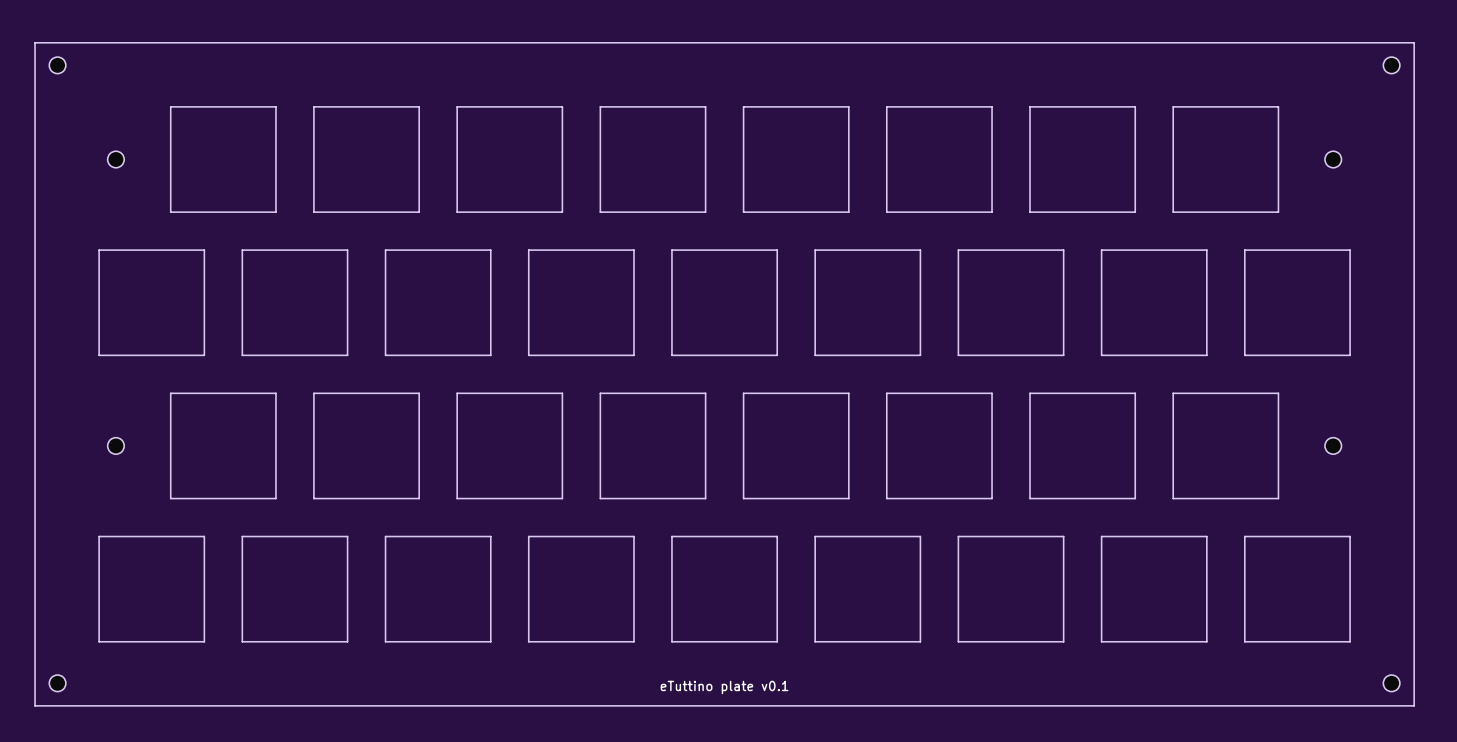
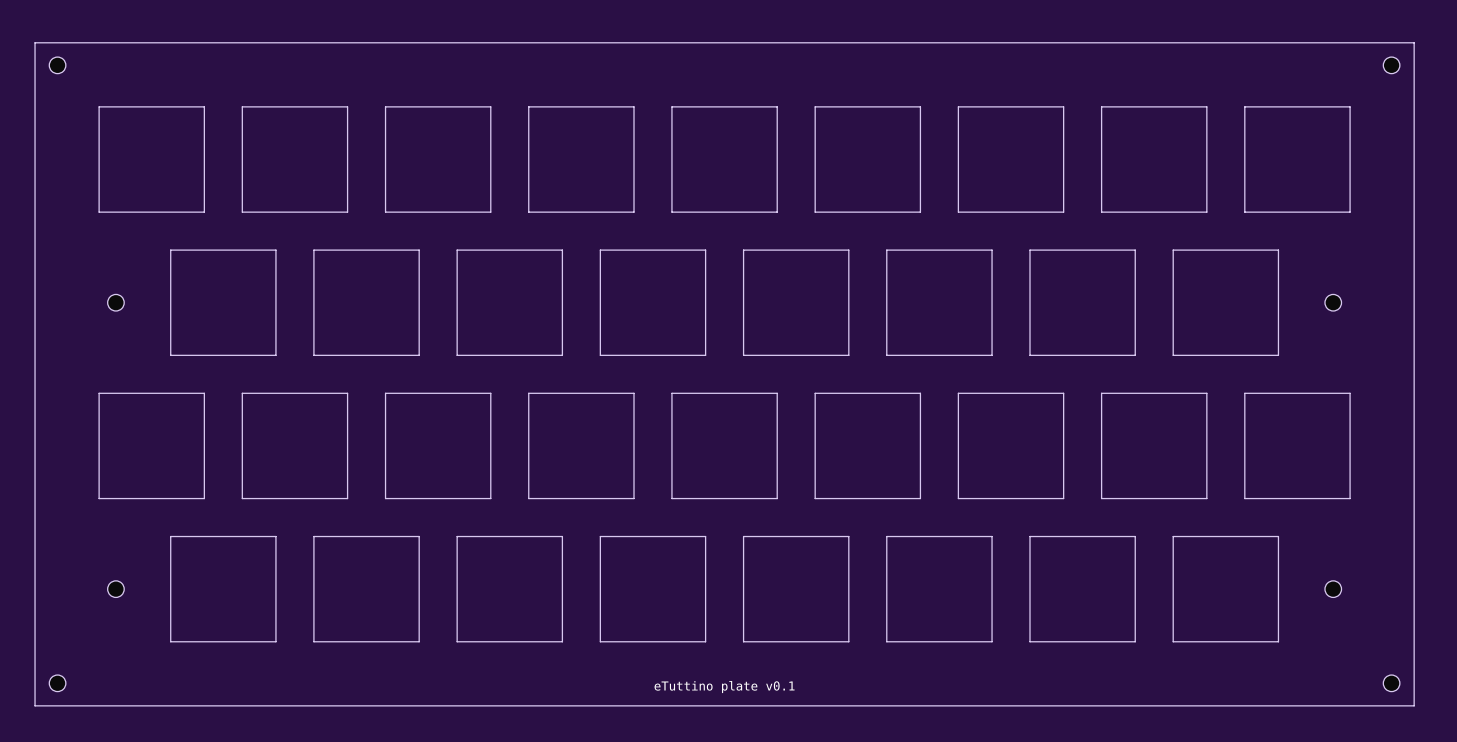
board edge: (170, 106) (170, 212) -> (170, 106) (99, 106) (99, 212) (170, 212)
board edge: (204, 106) (242, 106) -> (204, 106) (204, 212)
board edge: (275, 106) (275, 212) -> (275, 106) (313, 106)
board edge: (313, 106) (313, 212) -> (275, 212) (313, 212)
board edge: (347, 106) (385, 106) -> (347, 106) (347, 212)
board edge: (419, 106) (419, 212) -> (419, 106) (457, 106)
board edge: (457, 106) (457, 212) -> (419, 212) (457, 212)
board edge: (490, 106) (528, 106) -> (490, 106) (490, 212)
board edge: (562, 106) (562, 212) -> (562, 106) (600, 106)
board edge: (600, 106) (600, 212) -> (562, 212) (600, 212)
board edge: (634, 106) (671, 106) -> (634, 106) (634, 212)
board edge: (705, 106) (705, 212) -> (705, 106) (743, 106)
board edge: (743, 106) (743, 212) -> (705, 212) (743, 212)
board edge: (777, 106) (815, 106) -> (777, 106) (777, 212)
board edge: (848, 106) (848, 212) -> (848, 106) (886, 106)
board edge: (886, 106) (886, 212) -> (848, 212) (886, 212)
board edge: (920, 106) (958, 106) -> (920, 106) (920, 212)
board edge: (992, 106) (992, 212) -> (992, 106) (1029, 106)
board edge: (1029, 106) (1029, 212) -> (992, 212) (1029, 212)
board edge: (1063, 106) (1101, 106) -> (1063, 106) (1063, 212)
board edge: (1135, 106) (1135, 212) -> (1135, 106) (1173, 106)
board edge: (1173, 106) (1173, 212) -> (1135, 212) (1173, 212)
board edge: (1206, 106) (1244, 106) -> (1206, 106) (1206, 212)
board edge: (1278, 106) (1278, 212) -> (1278, 106) (1350, 106) (1350, 212) (1278, 212)
part: (115, 159) -> none
part: (1333, 159) -> none
board edge: (204, 212) (242, 212) -> (242, 106) (242, 212)
board edge: (347, 212) (385, 212) -> (385, 106) (385, 212)
board edge: (490, 212) (528, 212) -> (528, 106) (528, 212)
board edge: (634, 212) (671, 212) -> (671, 106) (671, 212)
board edge: (777, 212) (815, 212) -> (815, 106) (815, 212)
board edge: (920, 212) (958, 212) -> (958, 106) (958, 212)
board edge: (1063, 212) (1101, 212) -> (1101, 106) (1101, 212)
board edge: (1206, 212) (1244, 212) -> (1244, 106) (1244, 212)
board edge: (170, 250) (99, 250) (99, 355) (170, 355) -> (170, 250) (170, 355)
board edge: (204, 250) (204, 355) -> (204, 250) (242, 250)
board edge: (242, 250) (242, 355) -> (204, 355) (242, 355)
board edge: (275, 250) (313, 250) -> (275, 250) (275, 355)
board edge: (347, 250) (347, 355) -> (347, 250) (385, 250)
board edge: (385, 250) (385, 355) -> (347, 355) (385, 355)
board edge: (419, 250) (457, 250) -> (419, 250) (419, 355)
board edge: (490, 250) (490, 355) -> (490, 250) (528, 250)
board edge: (528, 250) (528, 355) -> (490, 355) (528, 355)
board edge: (562, 250) (600, 250) -> (562, 250) (562, 355)
board edge: (634, 250) (634, 355) -> (634, 250) (671, 250)
board edge: (671, 250) (671, 355) -> (634, 355) (671, 355)
board edge: (705, 250) (743, 250) -> (705, 250) (705, 355)
board edge: (777, 250) (777, 355) -> (777, 250) (815, 250)
board edge: (815, 250) (815, 355) -> (777, 355) (815, 355)
board edge: (848, 250) (886, 250) -> (848, 250) (848, 355)
board edge: (920, 250) (920, 355) -> (920, 250) (958, 250)
board edge: (958, 250) (958, 355) -> (920, 355) (958, 355)
board edge: (992, 250) (1029, 250) -> (992, 250) (992, 355)
board edge: (1063, 250) (1063, 355) -> (1063, 250) (1101, 250)
board edge: (1101, 250) (1101, 355) -> (1063, 355) (1101, 355)
board edge: (1135, 250) (1173, 250) -> (1135, 250) (1135, 355)
board edge: (1206, 250) (1206, 355) -> (1206, 250) (1244, 250)
board edge: (1244, 250) (1244, 355) -> (1206, 355) (1244, 355)
board edge: (1278, 250) (1350, 250) (1350, 355) (1278, 355) -> (1278, 250) (1278, 355)
part: none -> (115, 302)
part: none -> (1333, 302)
board edge: (275, 355) (313, 355) -> (313, 250) (313, 355)
board edge: (419, 355) (457, 355) -> (457, 250) (457, 355)
board edge: (562, 355) (600, 355) -> (600, 250) (600, 355)
board edge: (705, 355) (743, 355) -> (743, 250) (743, 355)
board edge: (848, 355) (886, 355) -> (886, 250) (886, 355)
board edge: (992, 355) (1029, 355) -> (1029, 250) (1029, 355)
board edge: (1135, 355) (1173, 355) -> (1173, 250) (1173, 355)
board edge: (170, 393) (170, 498) -> (170, 393) (99, 393) (99, 498) (170, 498)
board edge: (204, 393) (242, 393) -> (204, 393) (204, 498)
board edge: (275, 393) (275, 498) -> (275, 393) (313, 393)
board edge: (313, 393) (313, 498) -> (275, 498) (313, 498)
board edge: (347, 393) (385, 393) -> (347, 393) (347, 498)
board edge: (419, 393) (419, 498) -> (419, 393) (457, 393)
board edge: (457, 393) (457, 498) -> (419, 498) (457, 498)
board edge: (490, 393) (528, 393) -> (490, 393) (490, 498)
board edge: (562, 393) (562, 498) -> (562, 393) (600, 393)
board edge: (600, 393) (600, 498) -> (562, 498) (600, 498)
board edge: (634, 393) (671, 393) -> (634, 393) (634, 498)
board edge: (705, 393) (705, 498) -> (705, 393) (743, 393)
board edge: (743, 393) (743, 498) -> (705, 498) (743, 498)
board edge: (777, 393) (815, 393) -> (777, 393) (777, 498)
board edge: (848, 393) (848, 498) -> (848, 393) (886, 393)
board edge: (886, 393) (886, 498) -> (848, 498) (886, 498)
board edge: (920, 393) (958, 393) -> (920, 393) (920, 498)
board edge: (992, 393) (992, 498) -> (992, 393) (1029, 393)
board edge: (1029, 393) (1029, 498) -> (992, 498) (1029, 498)
board edge: (1063, 393) (1101, 393) -> (1063, 393) (1063, 498)
board edge: (1135, 393) (1135, 498) -> (1135, 393) (1173, 393)
board edge: (1173, 393) (1173, 498) -> (1135, 498) (1173, 498)
board edge: (1206, 393) (1244, 393) -> (1206, 393) (1206, 498)
board edge: (1278, 393) (1278, 498) -> (1278, 393) (1350, 393) (1350, 498) (1278, 498)
part: (115, 445) -> none
part: (1333, 445) -> none
board edge: (204, 498) (242, 498) -> (242, 393) (242, 498)
board edge: (347, 498) (385, 498) -> (385, 393) (385, 498)
board edge: (490, 498) (528, 498) -> (528, 393) (528, 498)
board edge: (634, 498) (671, 498) -> (671, 393) (671, 498)
board edge: (777, 498) (815, 498) -> (815, 393) (815, 498)
board edge: (920, 498) (958, 498) -> (958, 393) (958, 498)
board edge: (1063, 498) (1101, 498) -> (1101, 393) (1101, 498)
board edge: (1206, 498) (1244, 498) -> (1244, 393) (1244, 498)
board edge: (170, 536) (99, 536) (99, 641) (170, 641) -> (170, 536) (170, 641)
board edge: (204, 536) (204, 641) -> (204, 536) (242, 536)
board edge: (242, 536) (242, 641) -> (204, 641) (242, 641)
board edge: (275, 536) (313, 536) -> (275, 536) (275, 641)
board edge: (347, 536) (347, 641) -> (347, 536) (385, 536)
board edge: (385, 536) (385, 641) -> (347, 641) (385, 641)
board edge: (419, 536) (457, 536) -> (419, 536) (419, 641)
board edge: (490, 536) (490, 641) -> (490, 536) (528, 536)
board edge: (528, 536) (528, 641) -> (490, 641) (528, 641)
board edge: (562, 536) (600, 536) -> (562, 536) (562, 641)
board edge: (634, 536) (634, 641) -> (634, 536) (671, 536)
board edge: (671, 536) (671, 641) -> (634, 641) (671, 641)
board edge: (705, 536) (743, 536) -> (705, 536) (705, 641)
board edge: (777, 536) (777, 641) -> (777, 536) (815, 536)
board edge: (815, 536) (815, 641) -> (777, 641) (815, 641)
board edge: (848, 536) (886, 536) -> (848, 536) (848, 641)
board edge: (920, 536) (920, 641) -> (920, 536) (958, 536)
board edge: (958, 536) (958, 641) -> (920, 641) (958, 641)
board edge: (992, 536) (1029, 536) -> (992, 536) (992, 641)
board edge: (1063, 536) (1063, 641) -> (1063, 536) (1101, 536)
board edge: (1101, 536) (1101, 641) -> (1063, 641) (1101, 641)
board edge: (1135, 536) (1173, 536) -> (1135, 536) (1135, 641)
board edge: (1206, 536) (1206, 641) -> (1206, 536) (1244, 536)
board edge: (1244, 536) (1244, 641) -> (1206, 641) (1244, 641)
board edge: (1278, 536) (1350, 536) (1350, 641) (1278, 641) -> (1278, 536) (1278, 641)
part: none -> (115, 589)
part: none -> (1333, 589)
board edge: (275, 641) (313, 641) -> (313, 536) (313, 641)
board edge: (419, 641) (457, 641) -> (457, 536) (457, 641)
board edge: (562, 641) (600, 641) -> (600, 536) (600, 641)
board edge: (705, 641) (743, 641) -> (743, 536) (743, 641)
board edge: (848, 641) (886, 641) -> (886, 536) (886, 641)
board edge: (992, 641) (1029, 641) -> (1029, 536) (1029, 641)
board edge: (1135, 641) (1173, 641) -> (1173, 536) (1173, 641)

